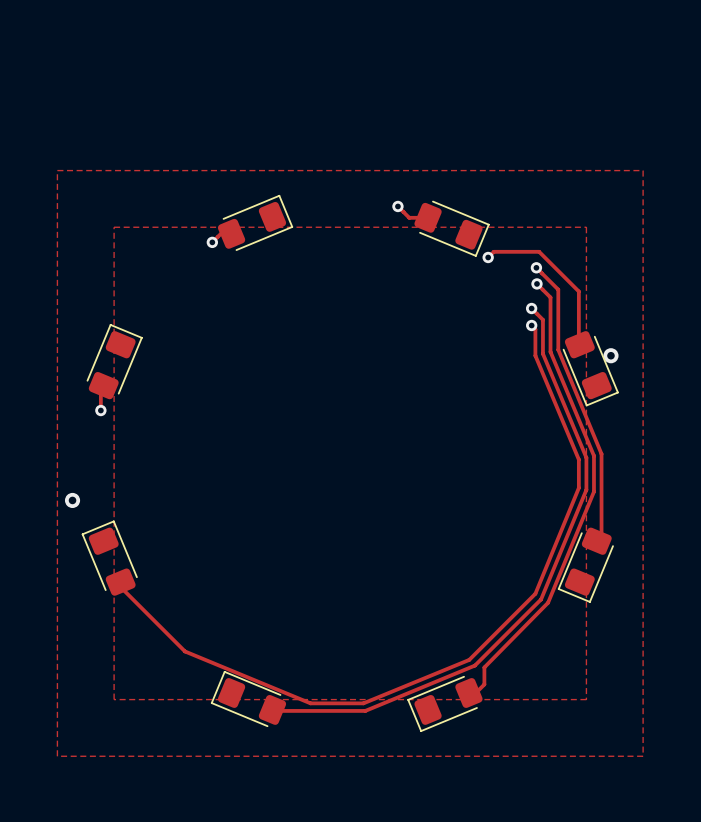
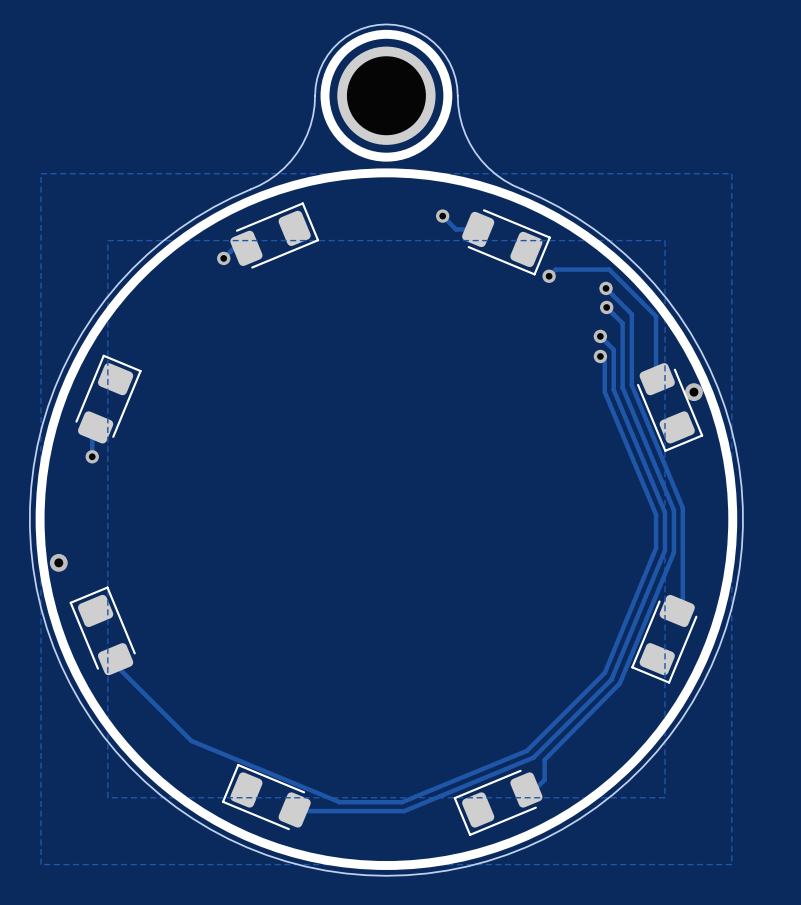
drawing: none -> [35, 29, 738, 870]
board edge: none -> (315, 95) (313, 115) (307, 134) (297, 152) (284, 167) (259, 185) (231, 197) (196, 217) (147, 254) (105, 299) (72, 350) (47, 406) (33, 466) (29, 527) (36, 588) (46, 627) (61, 666) (91, 719) (129, 767) (160, 794) (193, 818) (247, 847) (305, 866) (345, 873) (386, 875) (447, 870) (506, 854) (562, 829) (612, 794) (642, 767) (669, 736) (692, 702) (711, 666) (731, 608) (739, 568) (742, 527) (739, 466) (730, 426) (717, 387) (700, 350) (679, 315) (654, 283) (609, 241) (559, 207) (504, 180) (481, 160) (470, 144) (462, 125) (453, 70) (445, 55) (433, 42) (419, 32) (395, 24) (377, 24) (353, 32) (339, 42) (327, 55) (317, 78) (315, 95)
part: none -> (386, 95)

